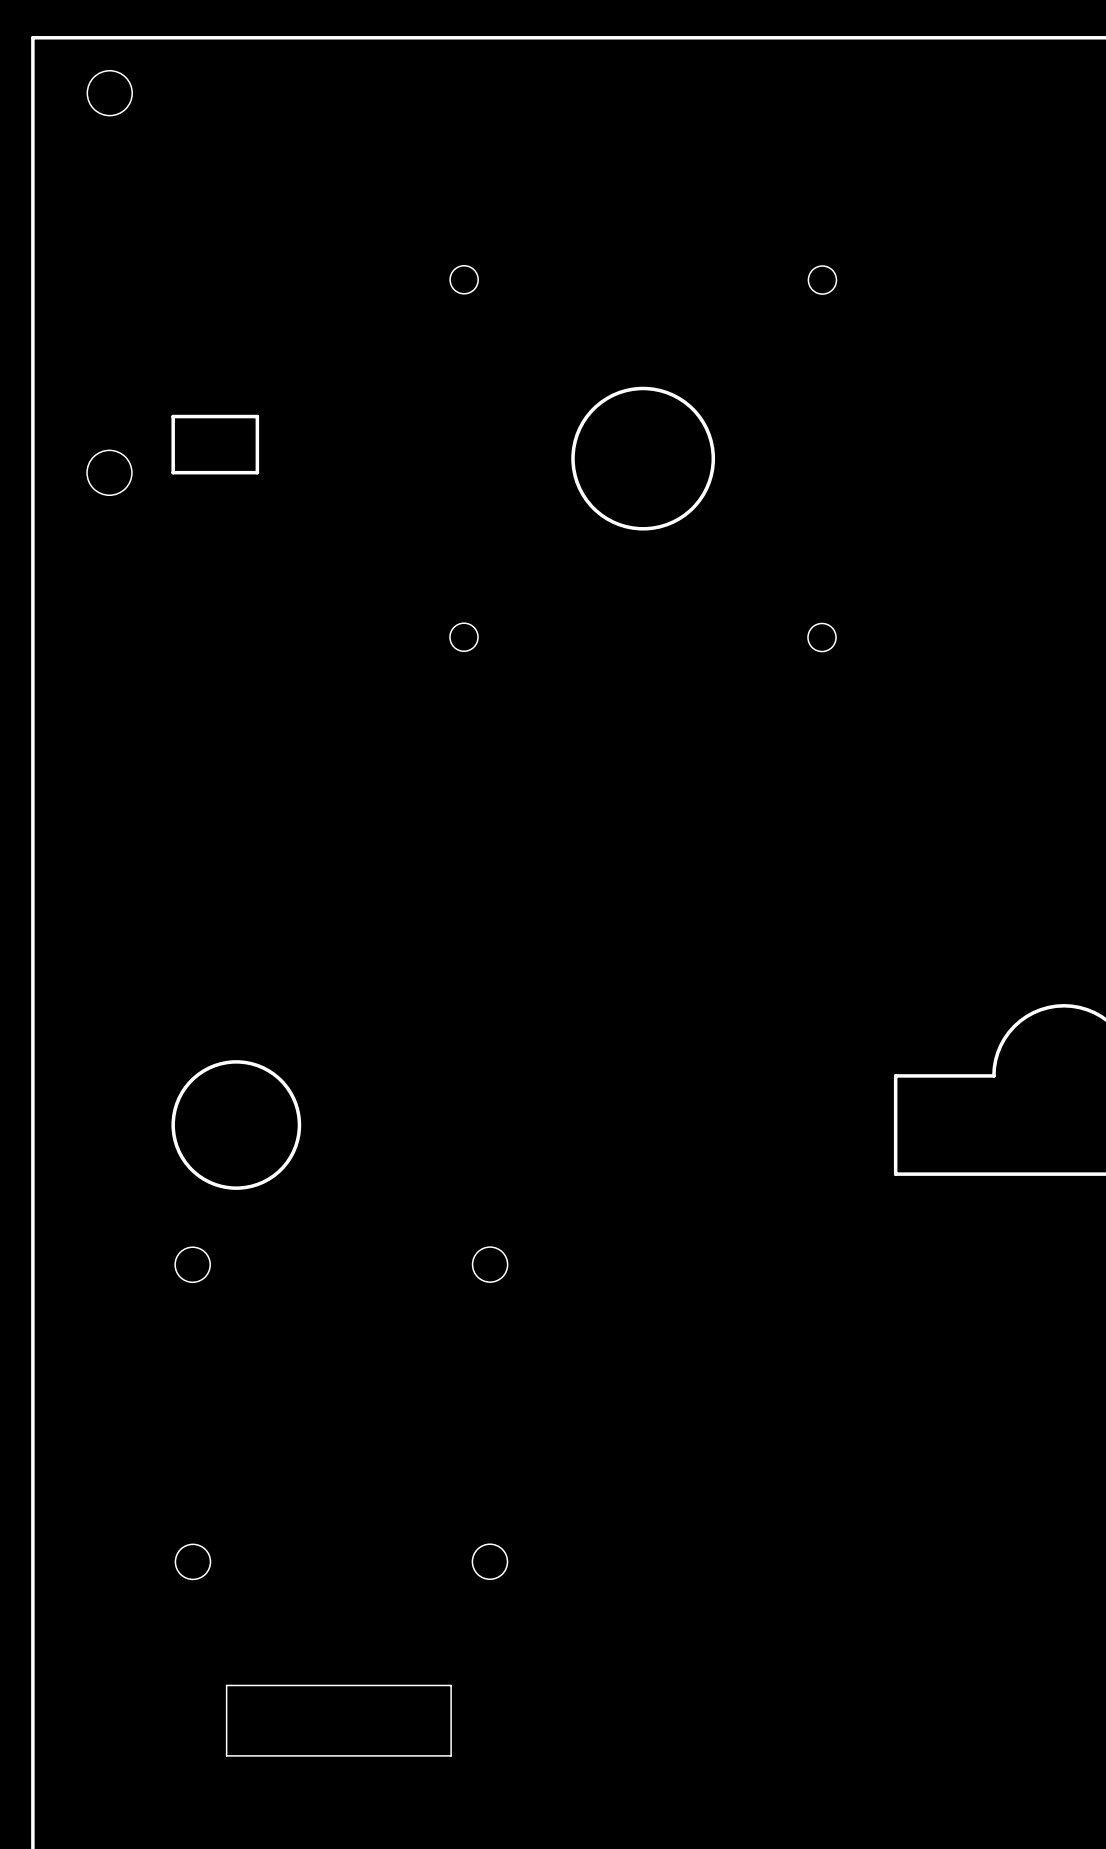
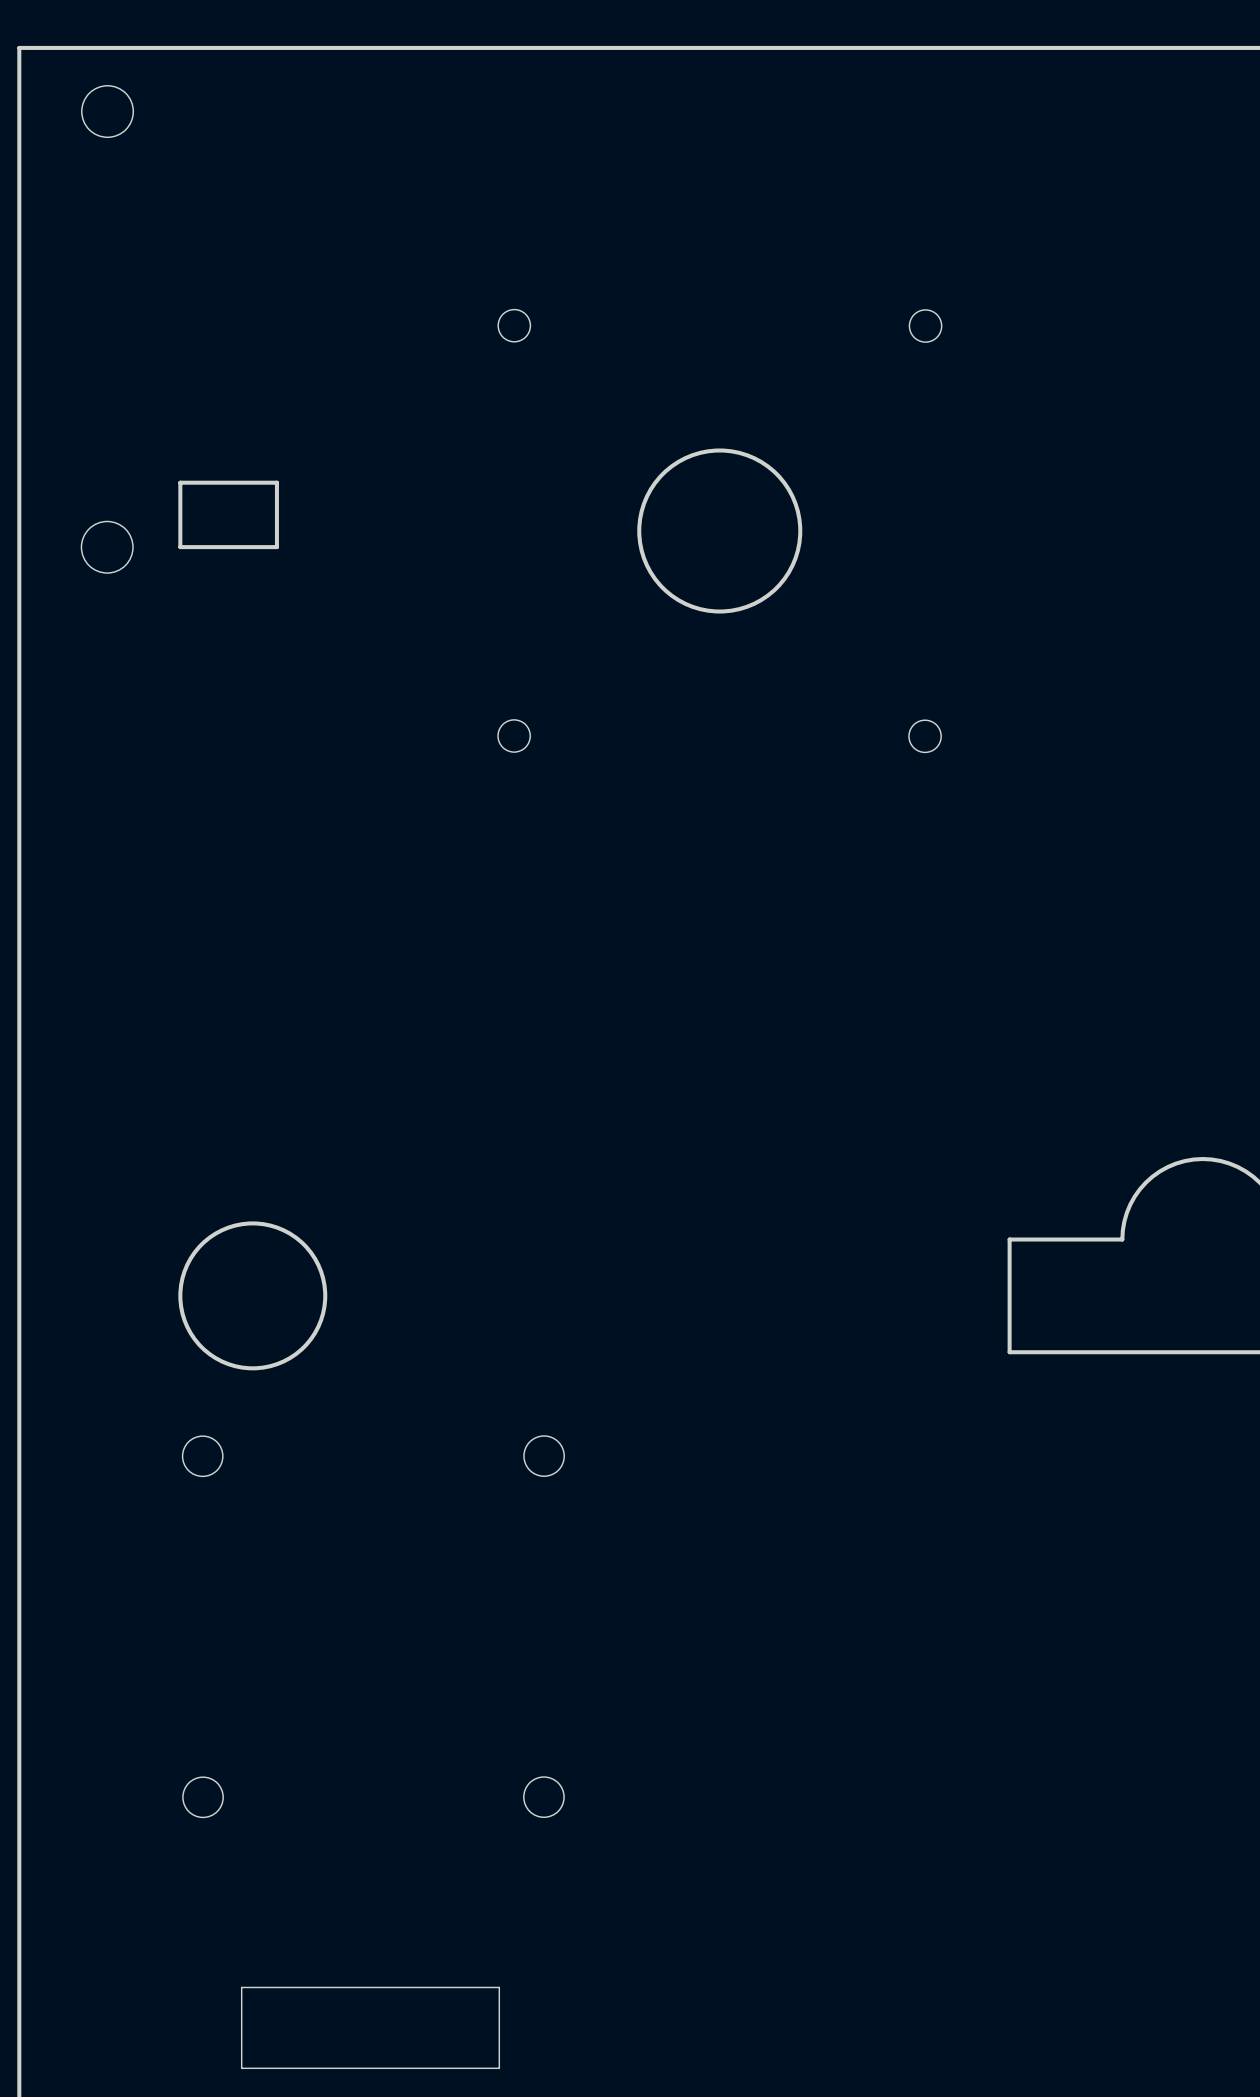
board edge: (451, 1727) (451, 1685) (226, 1685) (226, 1727) -> (499, 1987) (241, 1987)
board edge: (451, 1755) (226, 1755) -> (499, 2020) (499, 2068) (241, 2068) (241, 2020)

